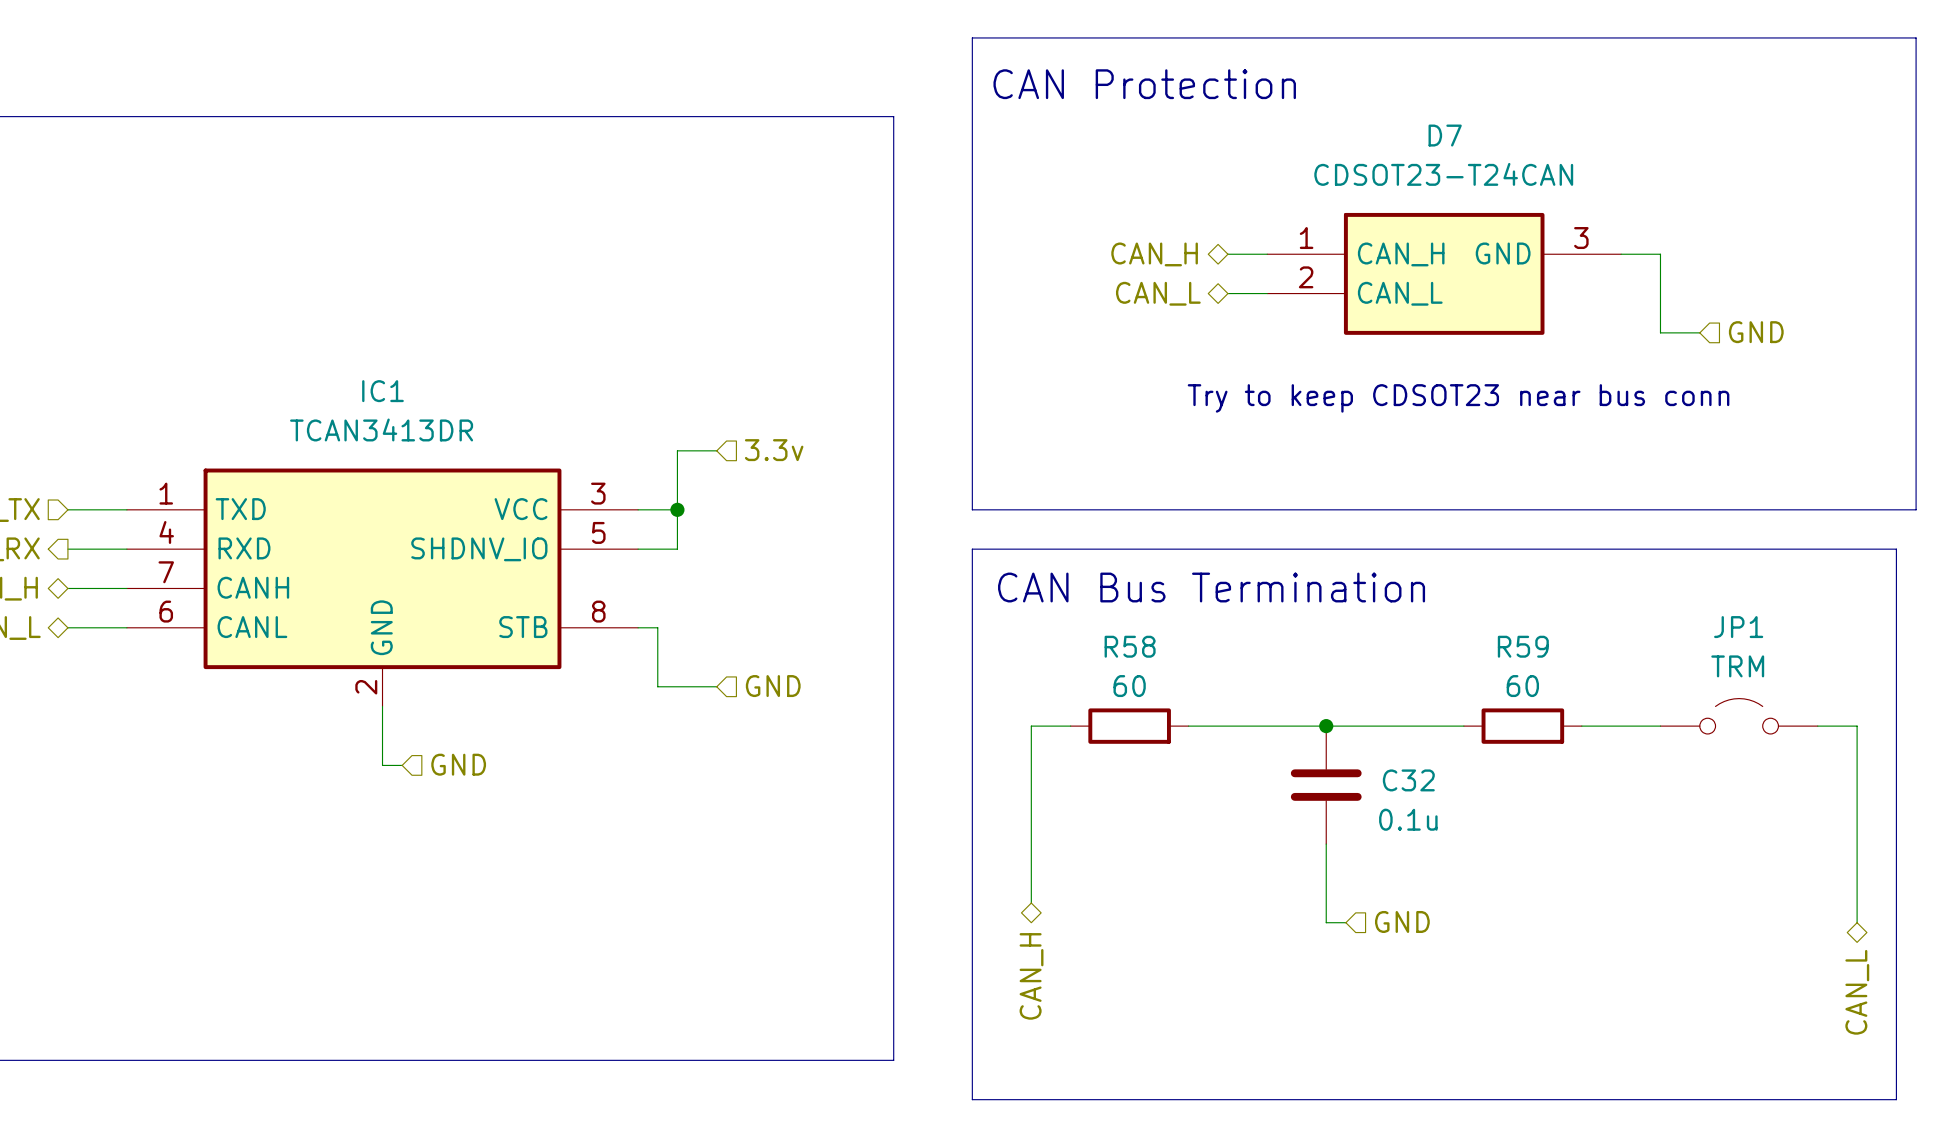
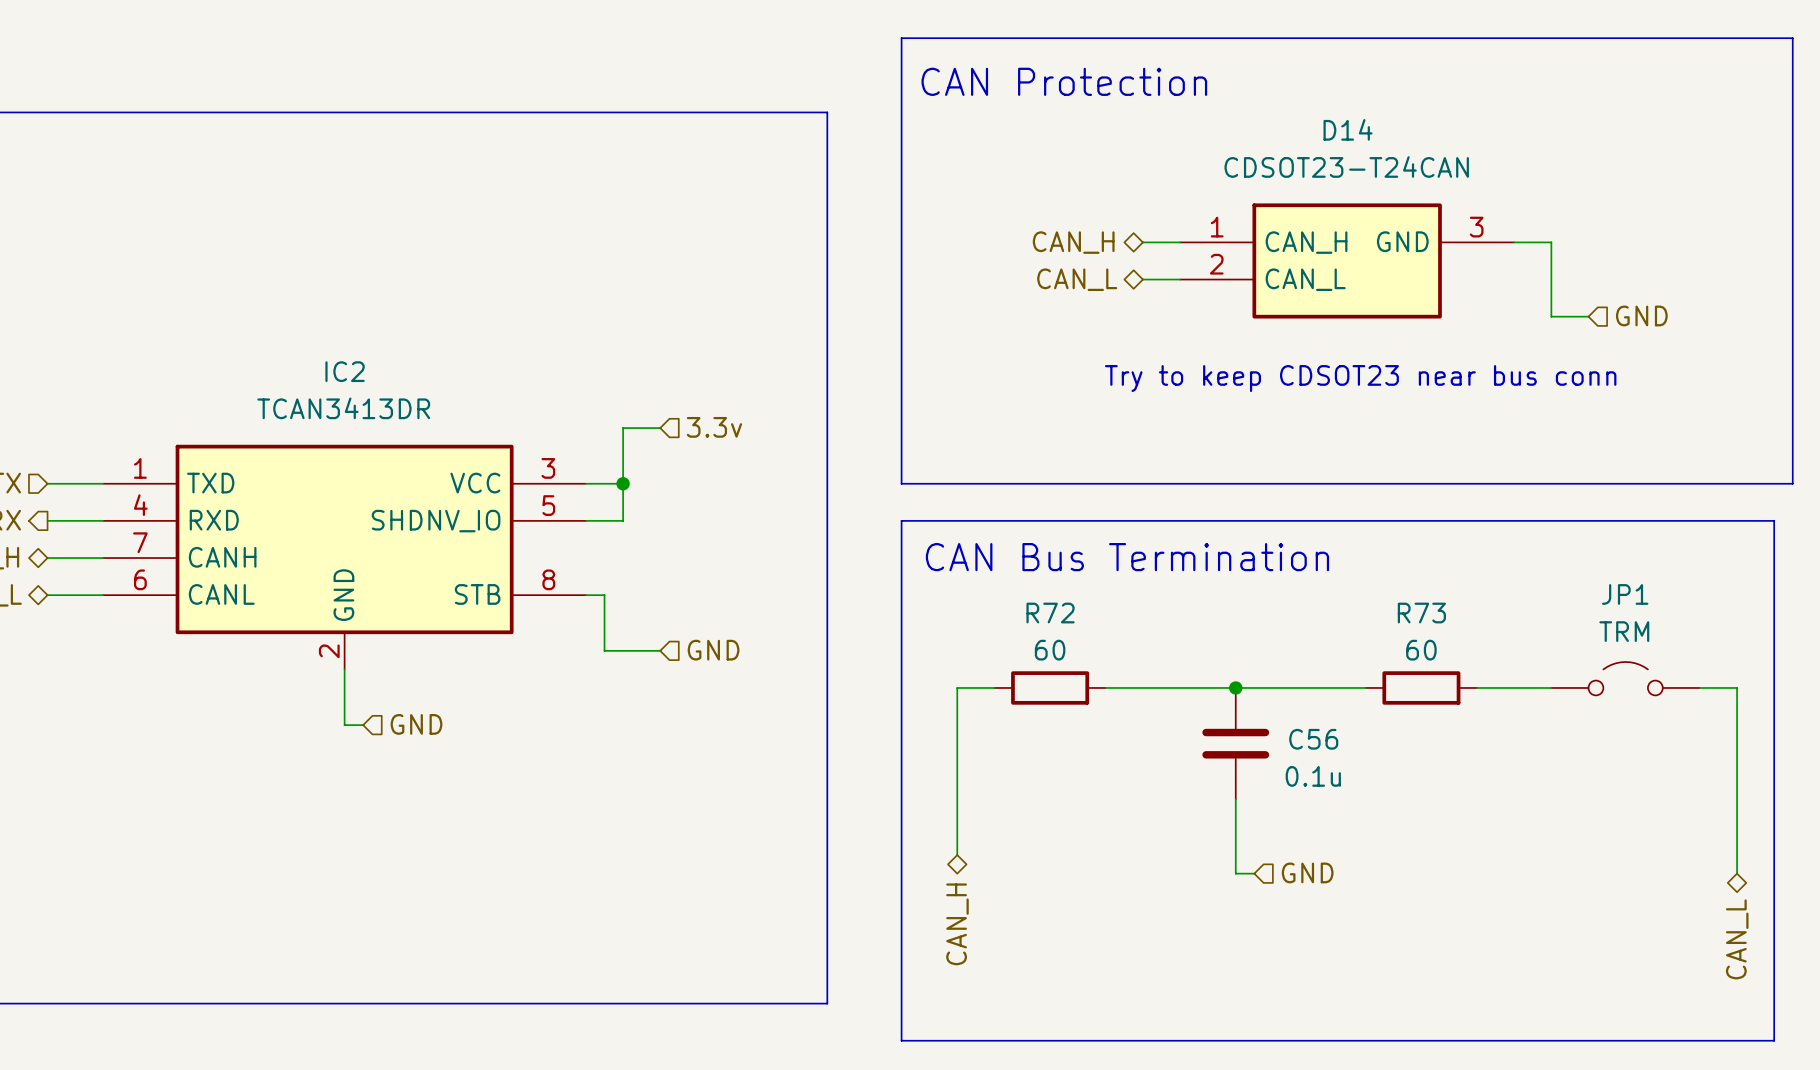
D7 name: D7 (1445, 135) -> D14 (1348, 129)
IC1 name: IC1 (382, 391) -> IC2 (345, 371)
R58 name: R58 (1130, 646) -> R72 (1050, 613)
R59 name: R59 (1523, 646) -> R73 (1421, 613)
C32 name: C32 (1408, 780) -> C56 (1313, 739)

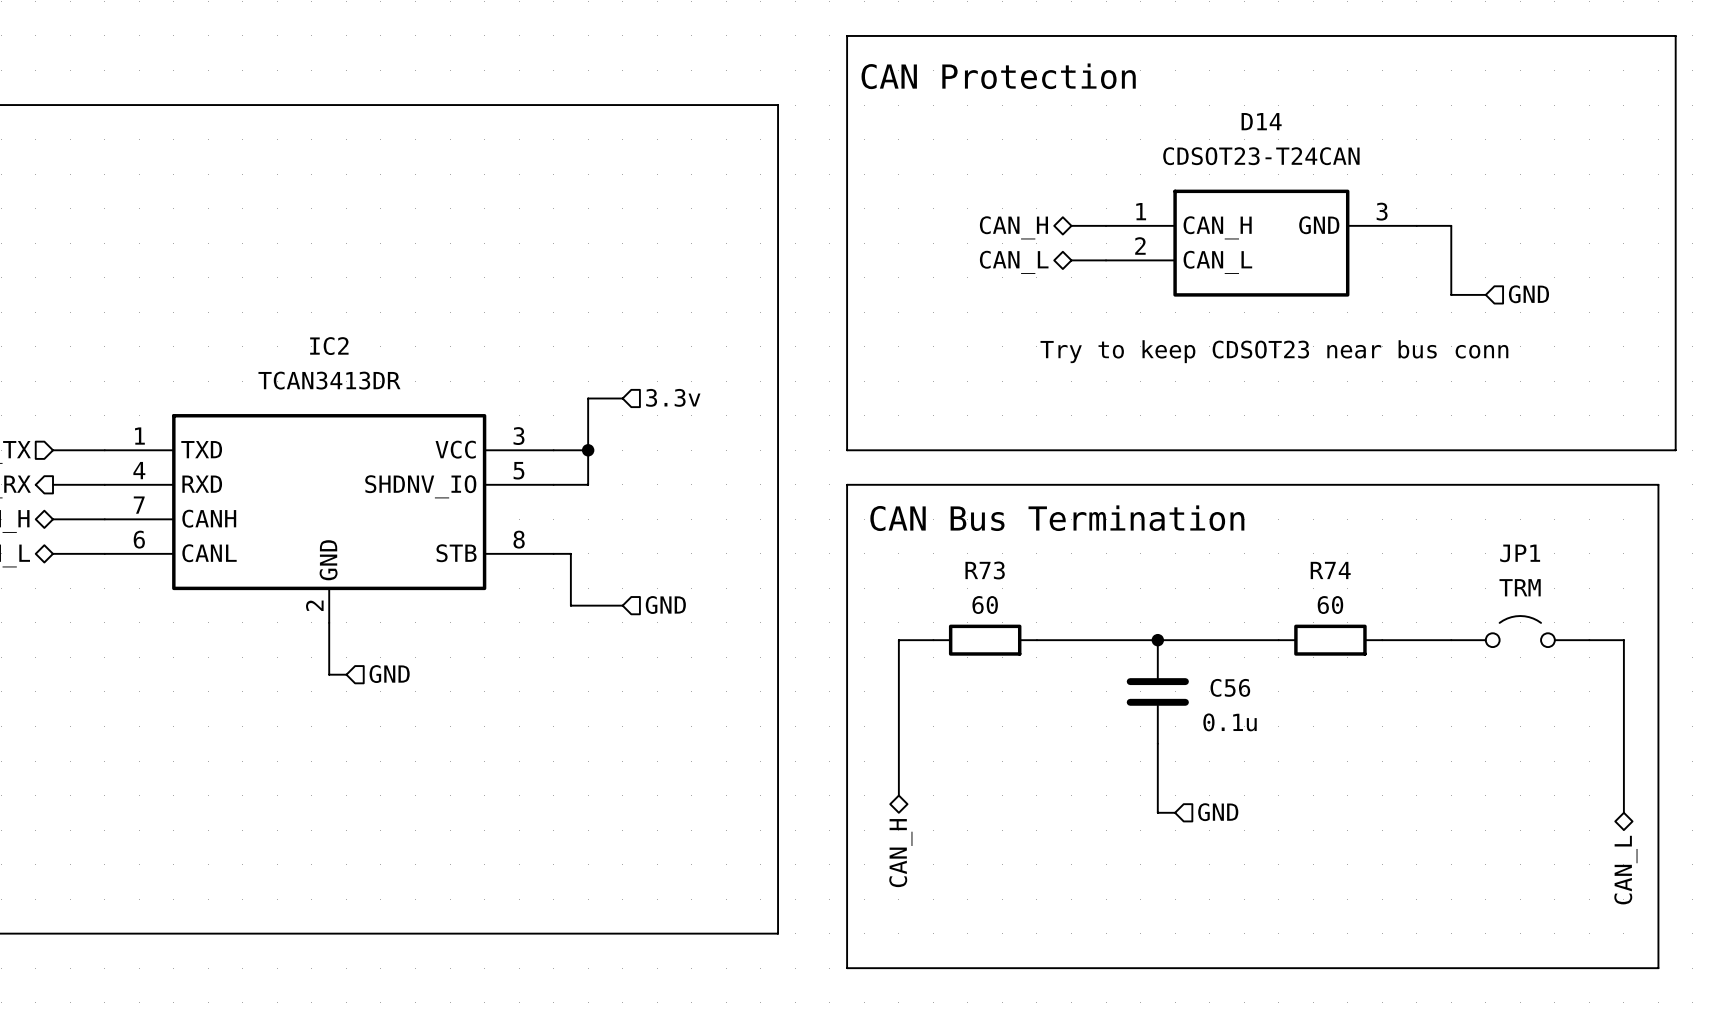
R72 name: R72 (1050, 613) -> R73 (985, 570)
R73 name: R73 (1421, 613) -> R74 (1330, 570)

